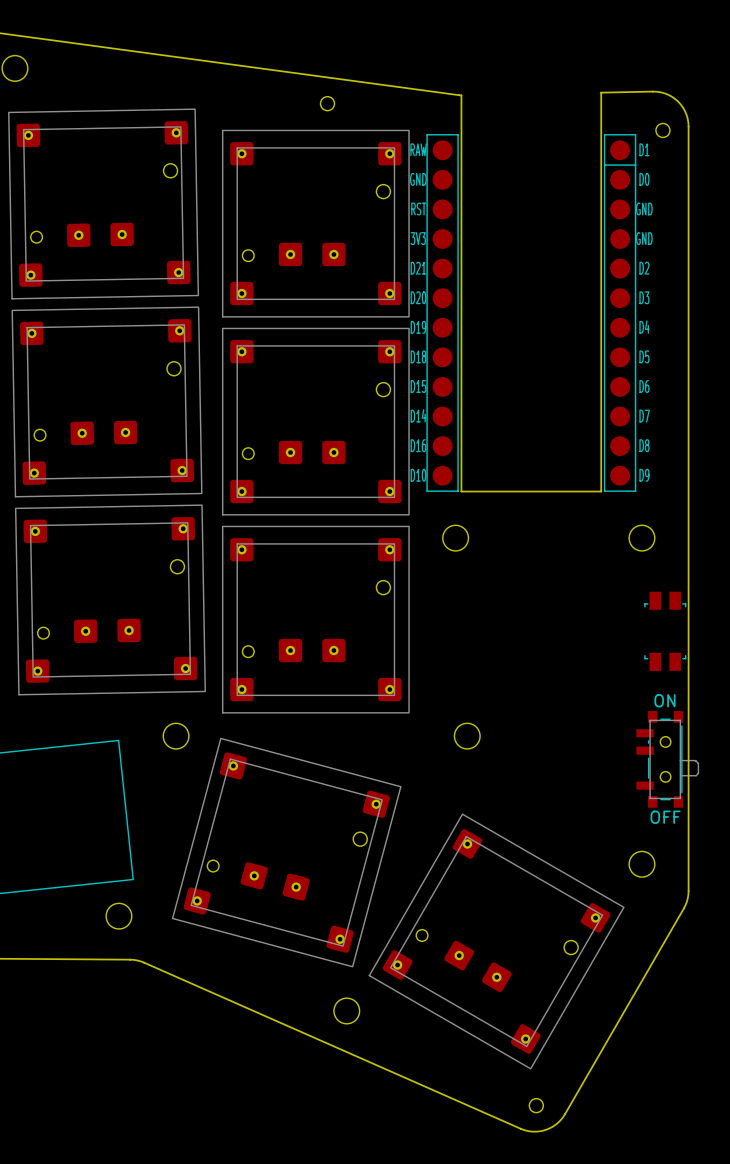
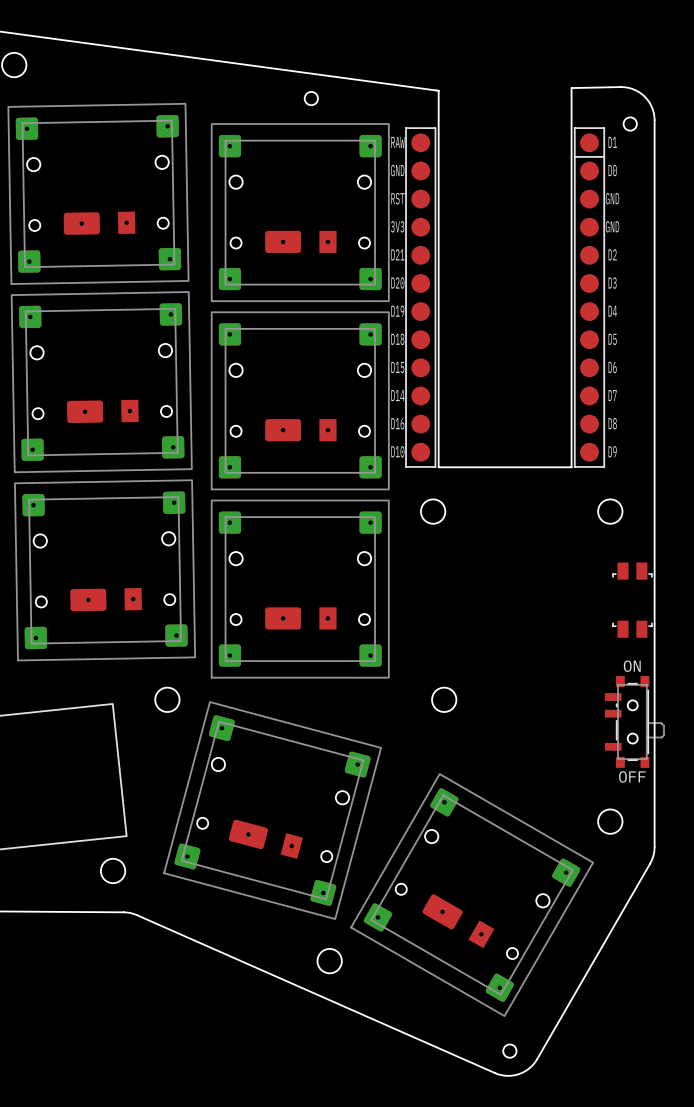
part footprint: [8, 108, 199, 300] -> [7, 103, 190, 285]
part footprint: [222, 129, 410, 318] -> [211, 123, 390, 302]
part footprint: [11, 306, 203, 498] -> [11, 291, 193, 473]
part footprint: [222, 327, 410, 516] -> [211, 311, 390, 490]
part footprint: [15, 504, 206, 696] -> [14, 479, 196, 662]
part footprint: [222, 525, 410, 714] -> [211, 499, 390, 679]
part footprint: [172, 737, 402, 968] -> [163, 701, 382, 920]
part footprint: [368, 813, 625, 1070] -> [350, 773, 594, 1017]

